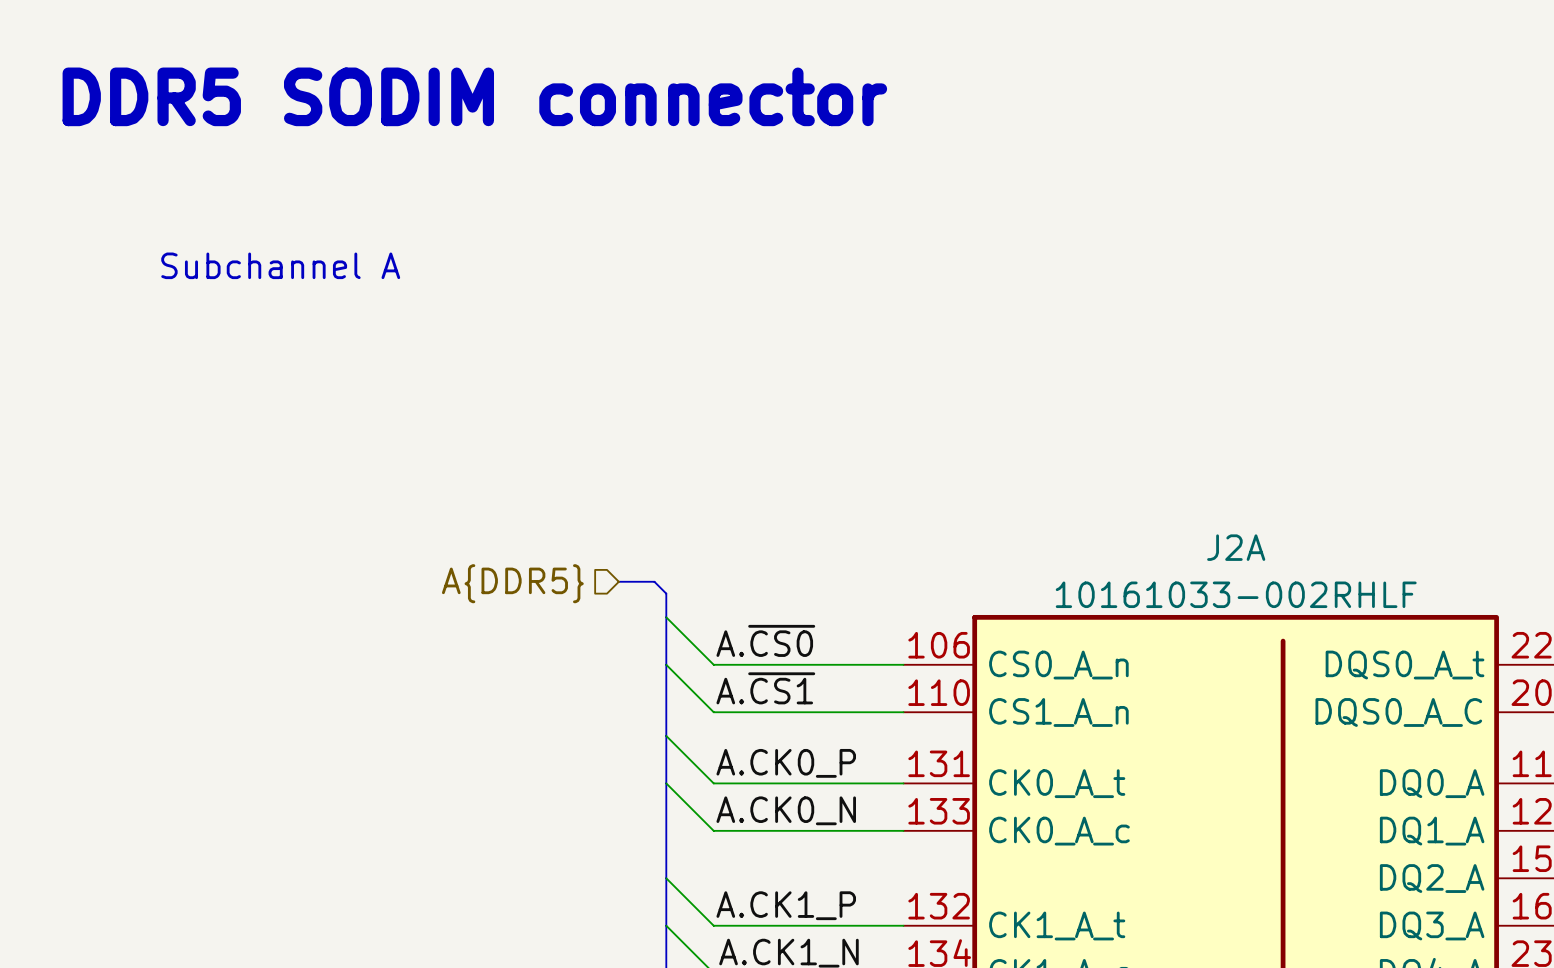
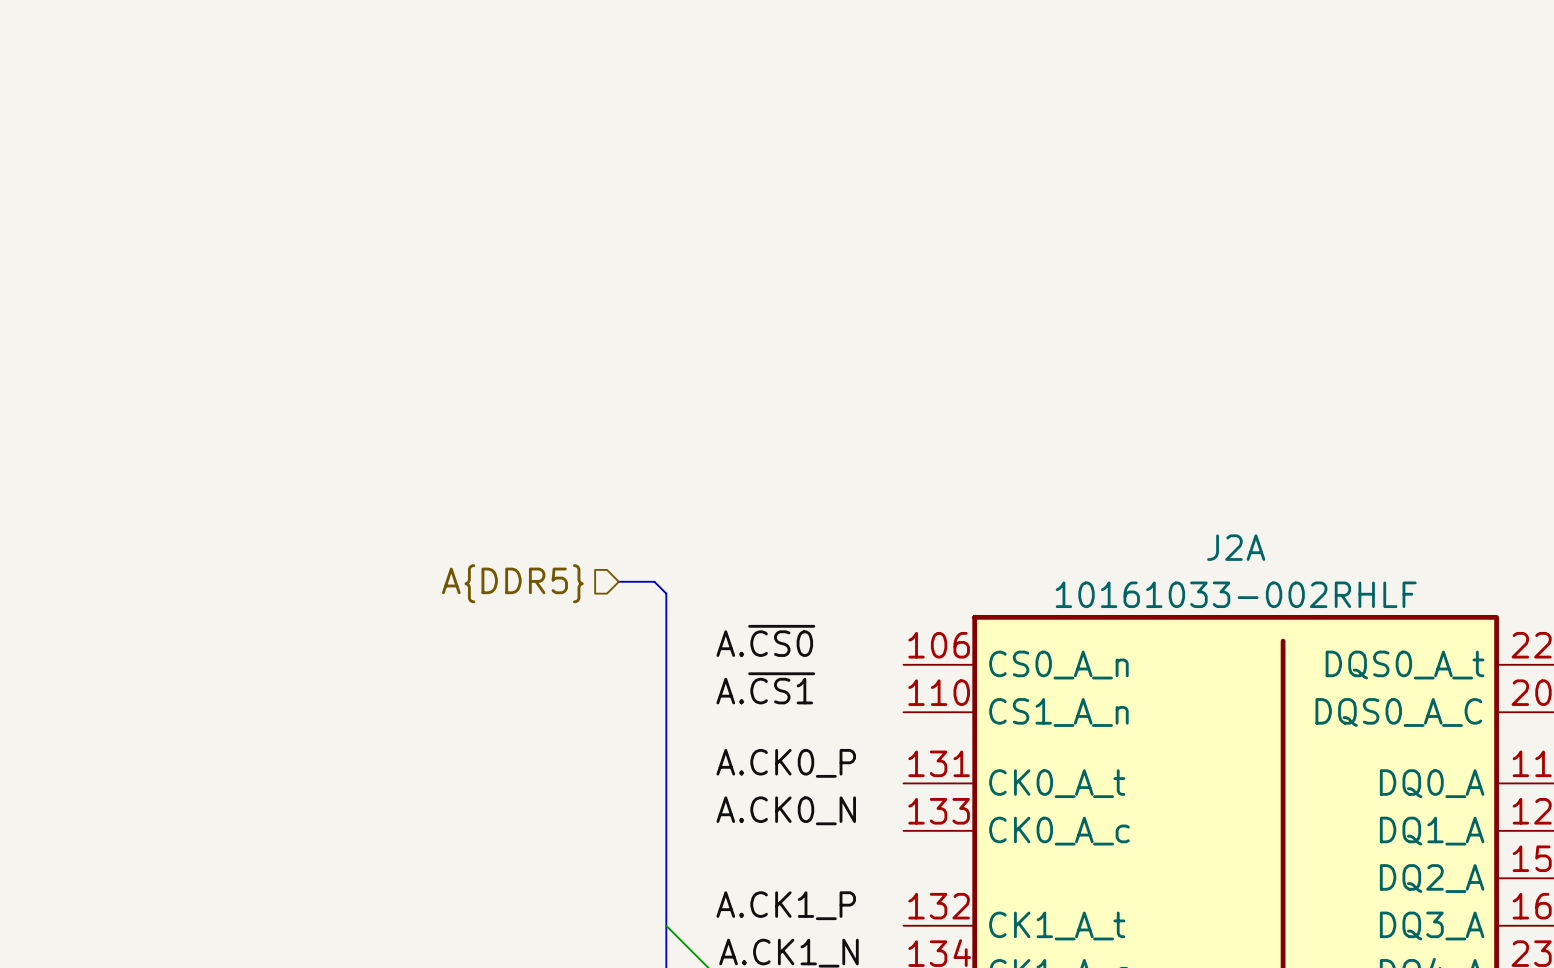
text: DDR5 SODIM connector (474, 96) -> none
text: Subchannel A (280, 265) -> none
wire: (666, 617) (713, 664) (903, 664) -> none
wire: (666, 664) (713, 712) (903, 712) -> none
wire: (666, 735) (713, 783) (903, 783) -> none
wire: (666, 783) (713, 830) (903, 830) -> none
wire: (666, 878) (713, 925) (903, 925) -> none

